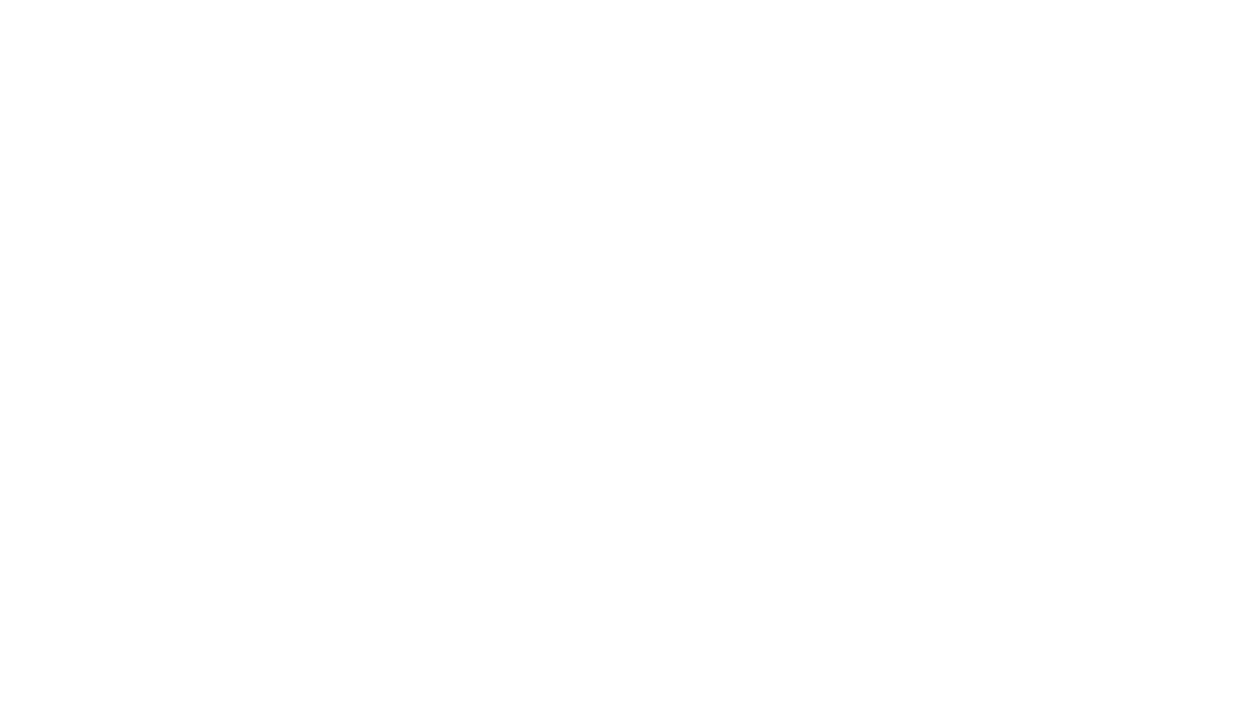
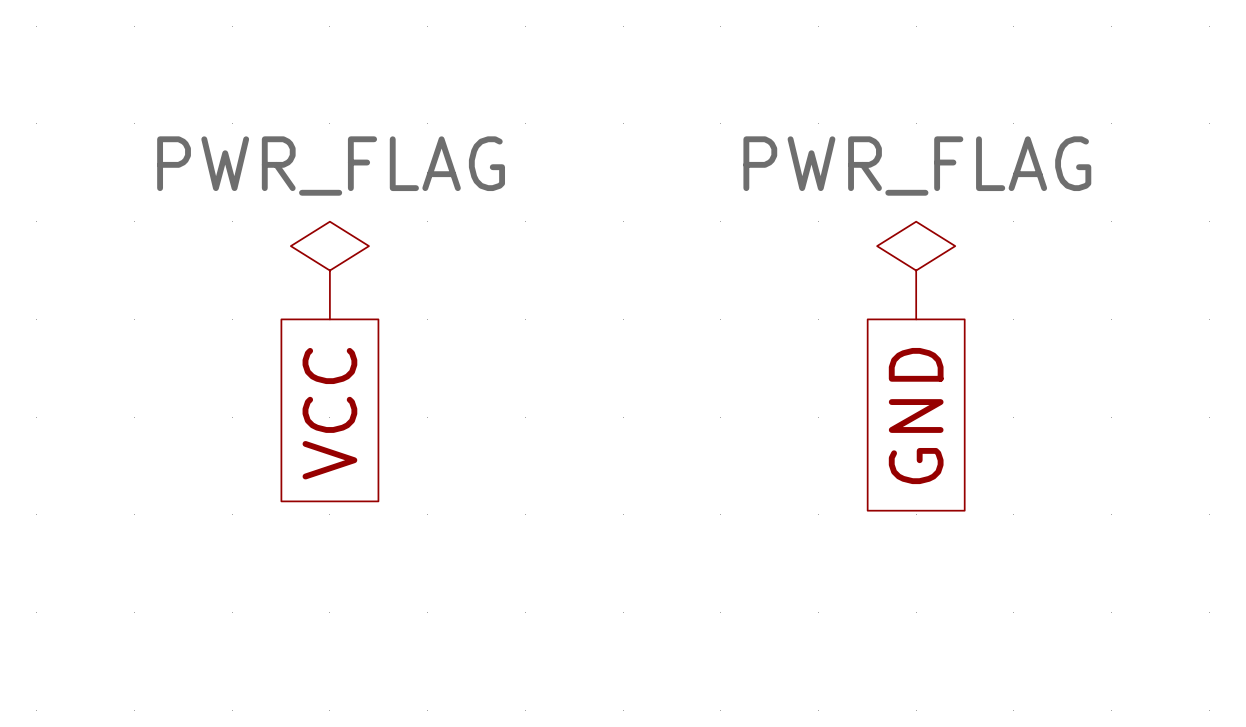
power symbol: none -> PWR_FLAG (329, 270)
power symbol: none -> PWR_FLAG (916, 270)
global label: none -> VCC (329, 413)
global label: none -> GND (916, 416)

